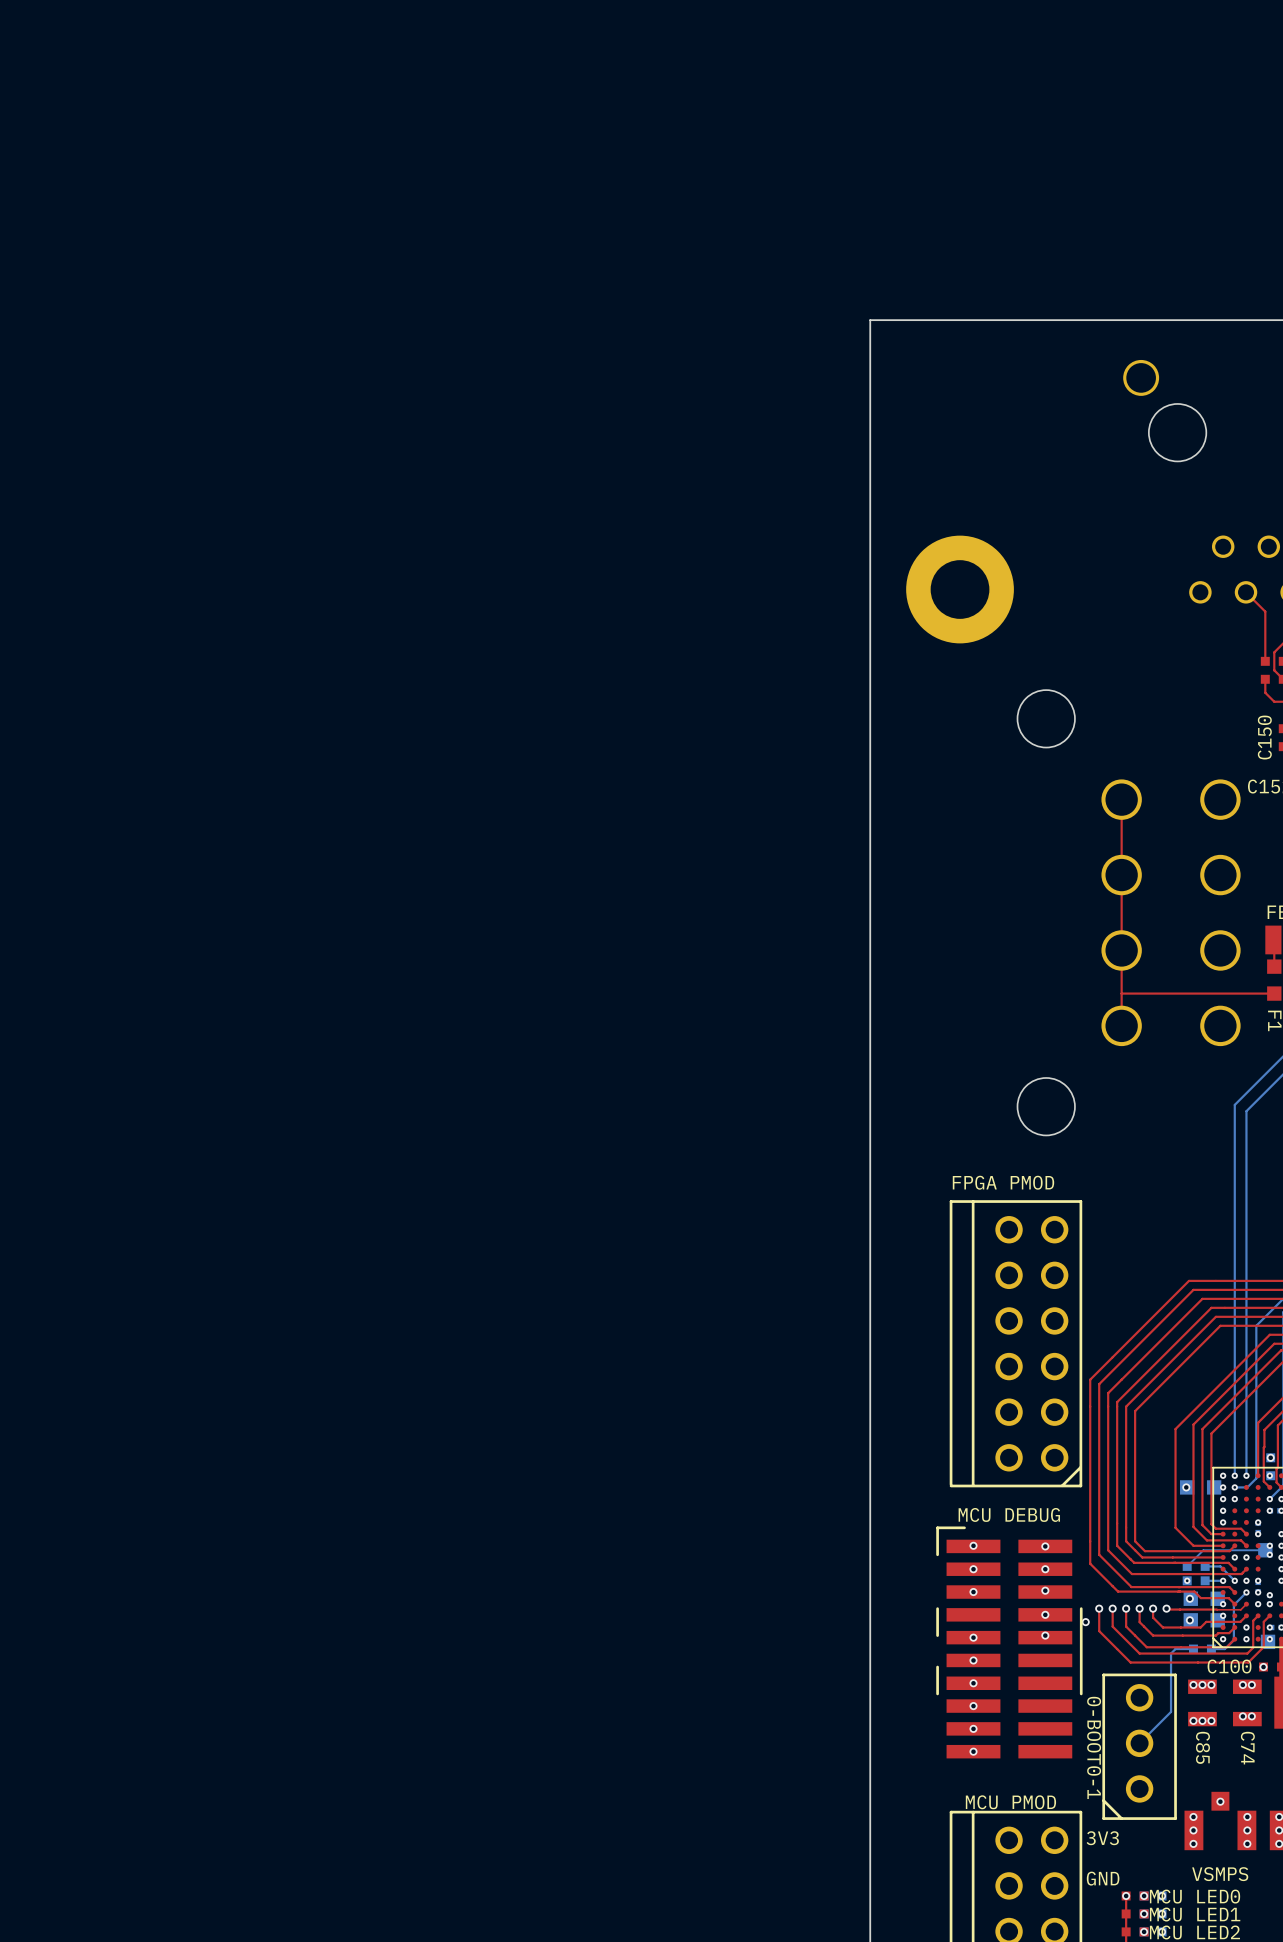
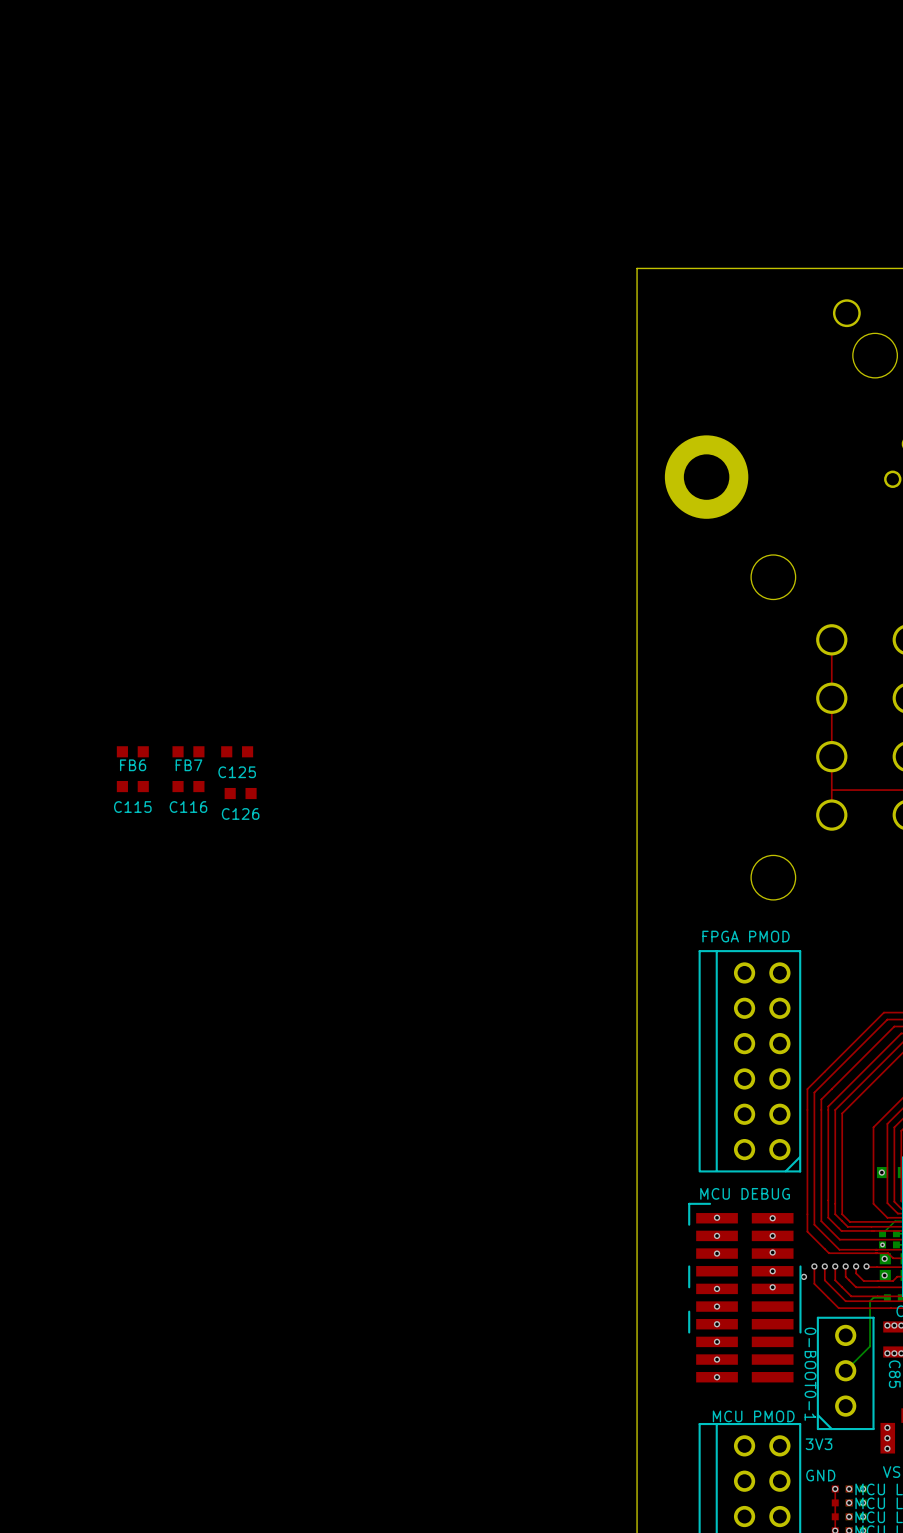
FB6: none -> (132, 751)
FB7: none -> (188, 751)
C125: none -> (237, 751)
C115: none -> (132, 786)
C116: none -> (188, 786)
C126: none -> (240, 793)

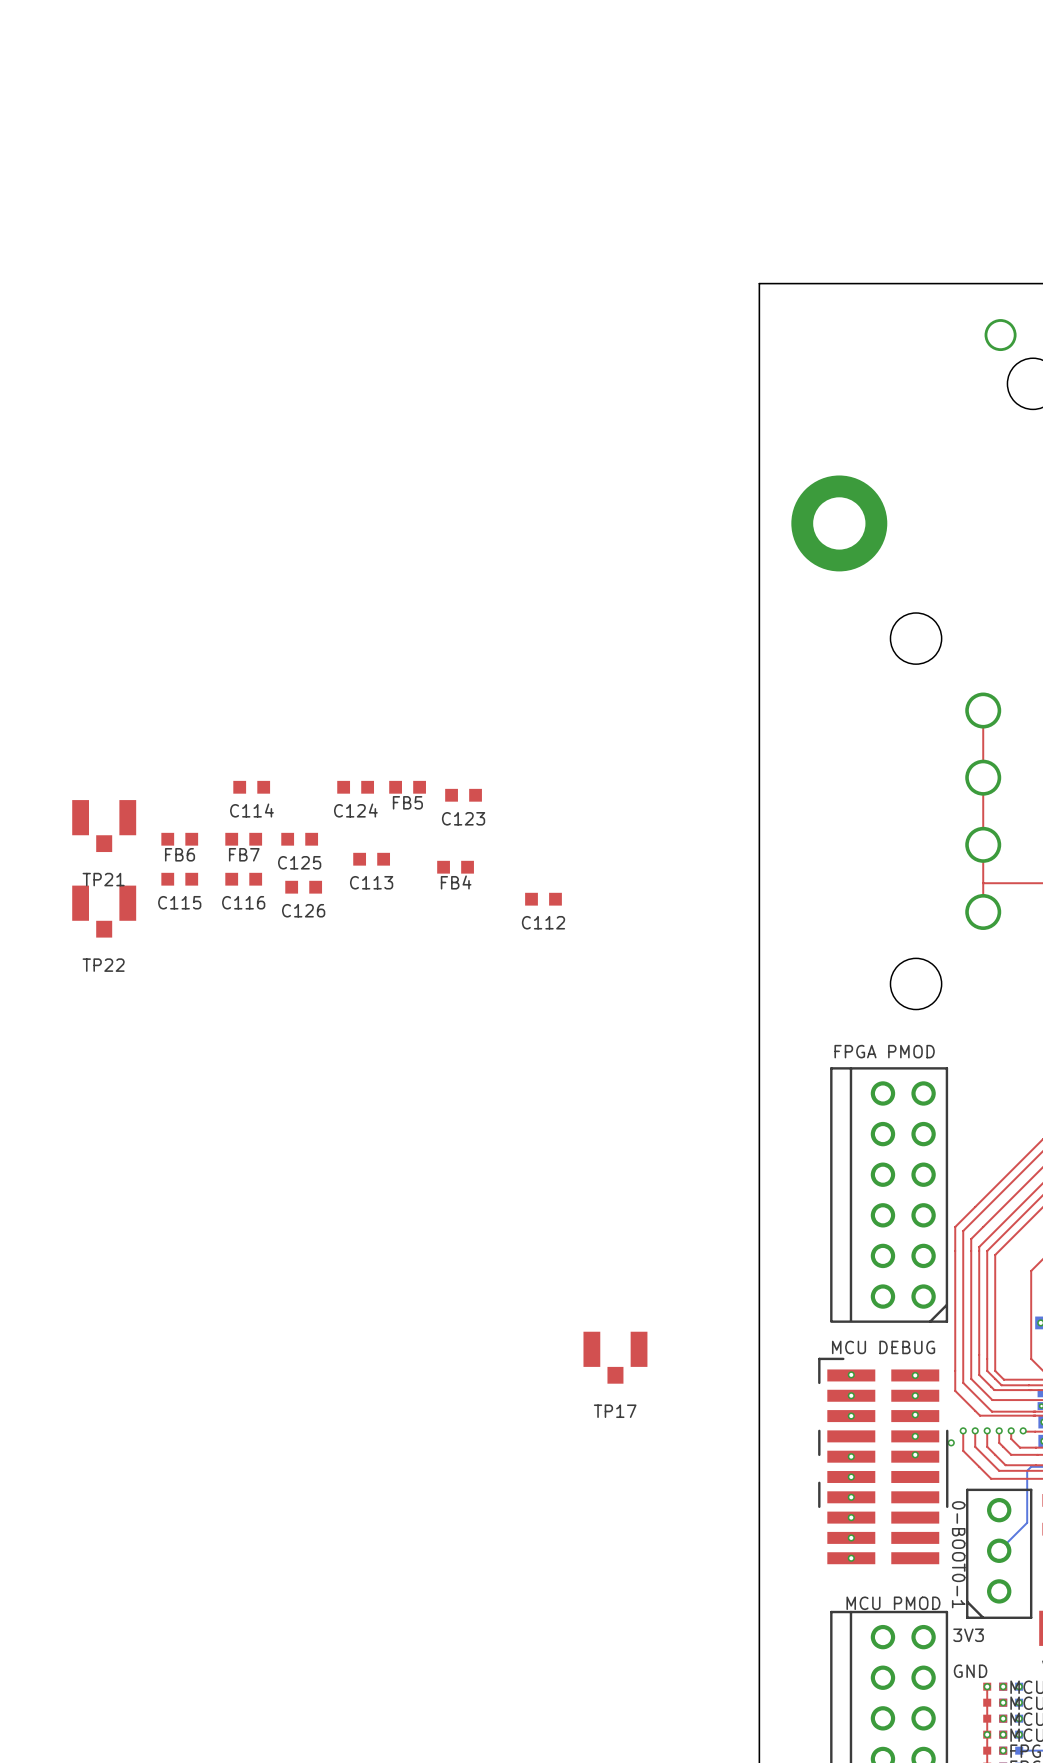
C114: none -> (251, 787)
C124: none -> (355, 787)
FB5: none -> (407, 787)
C123: none -> (463, 795)
TP21: none -> (104, 826)
C113: none -> (371, 859)
FB4: none -> (455, 867)
C112: none -> (543, 899)
TP22: none -> (104, 911)
TP17: none -> (615, 1357)

